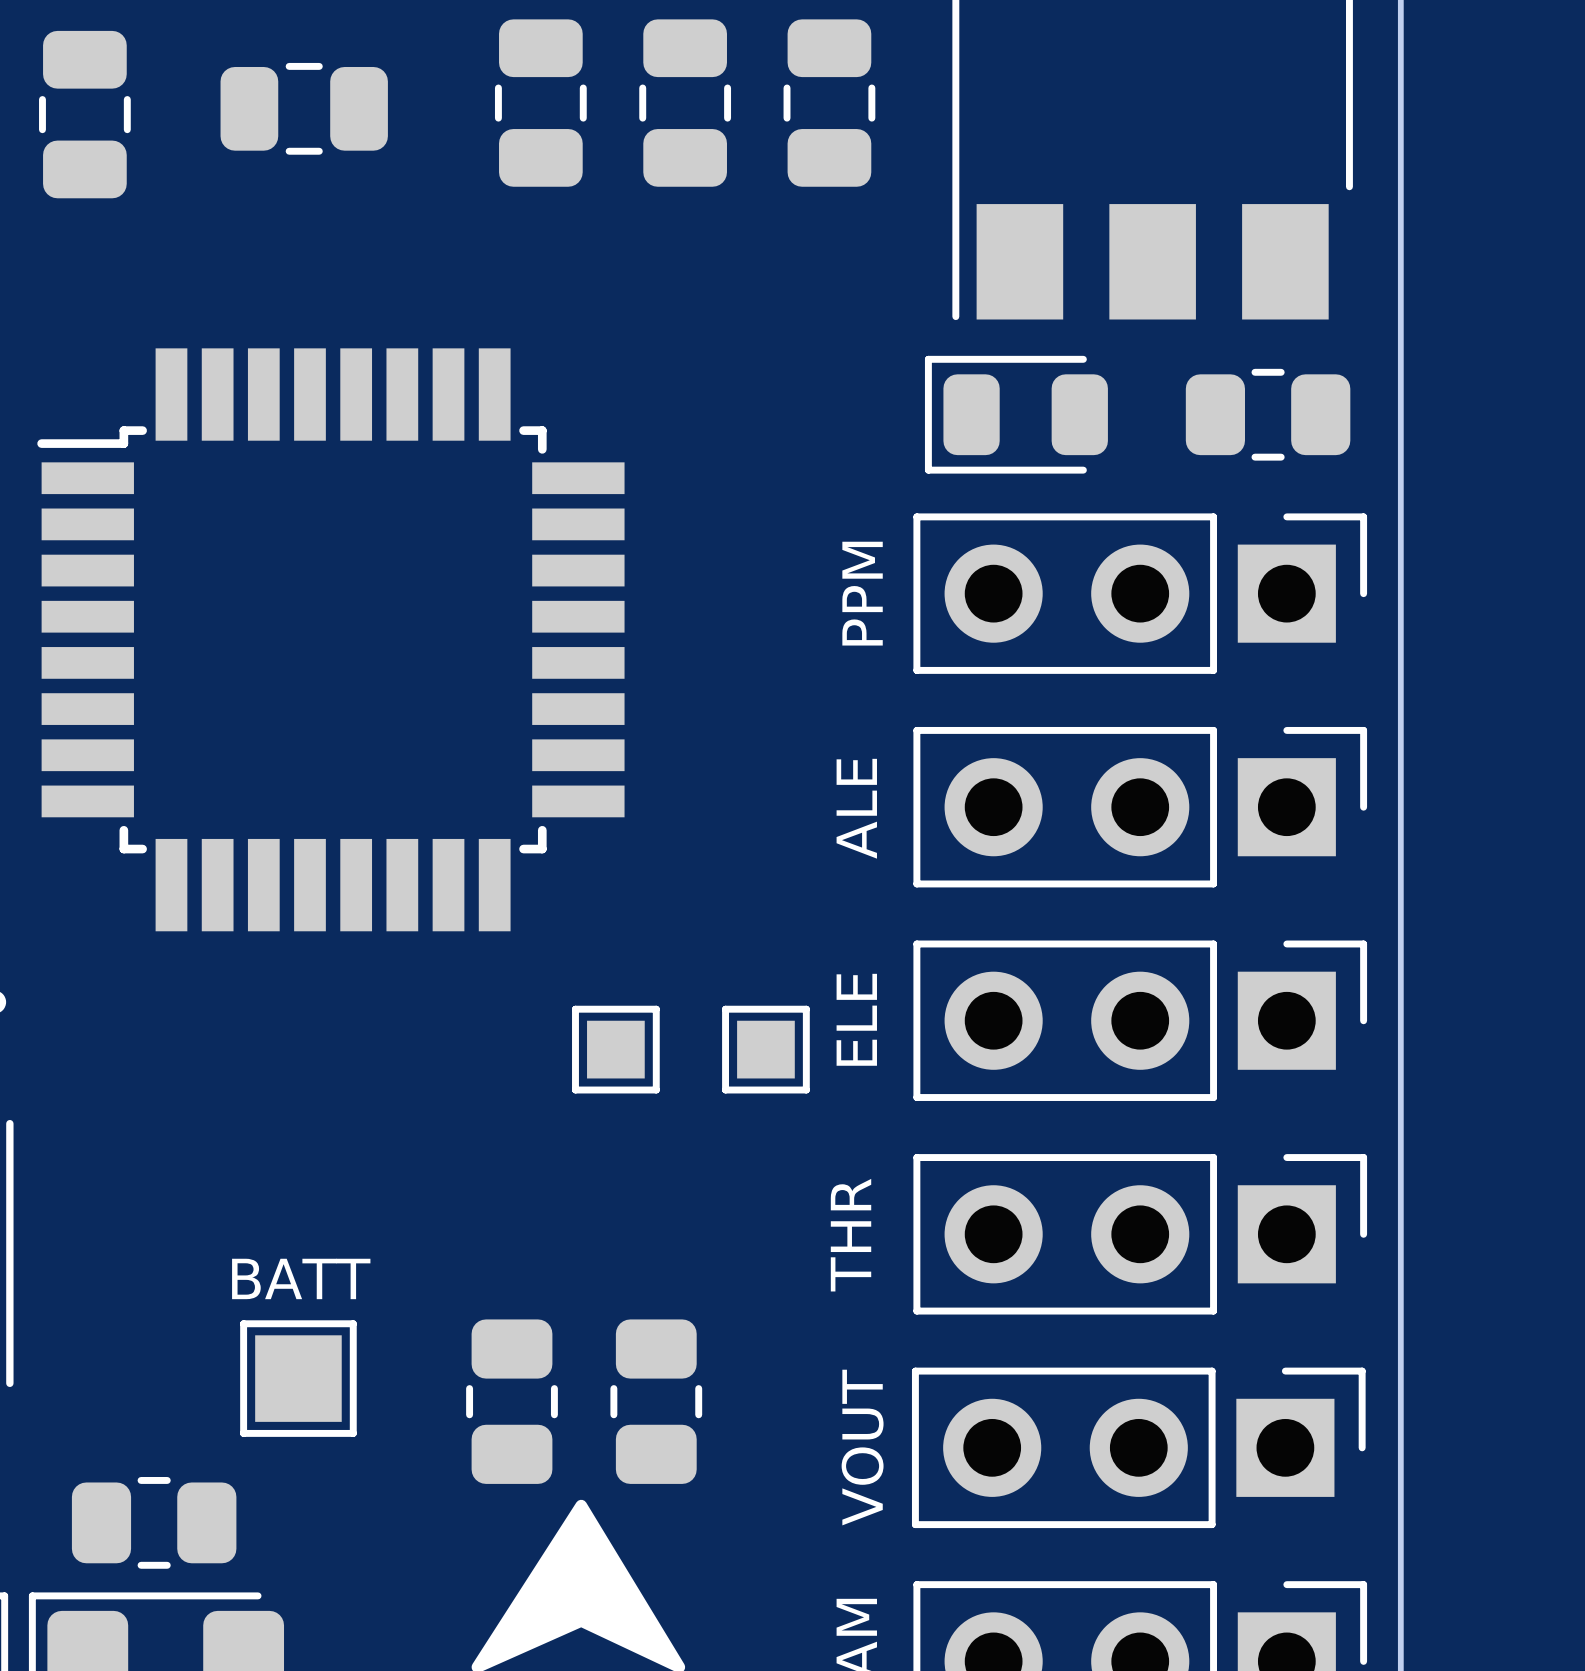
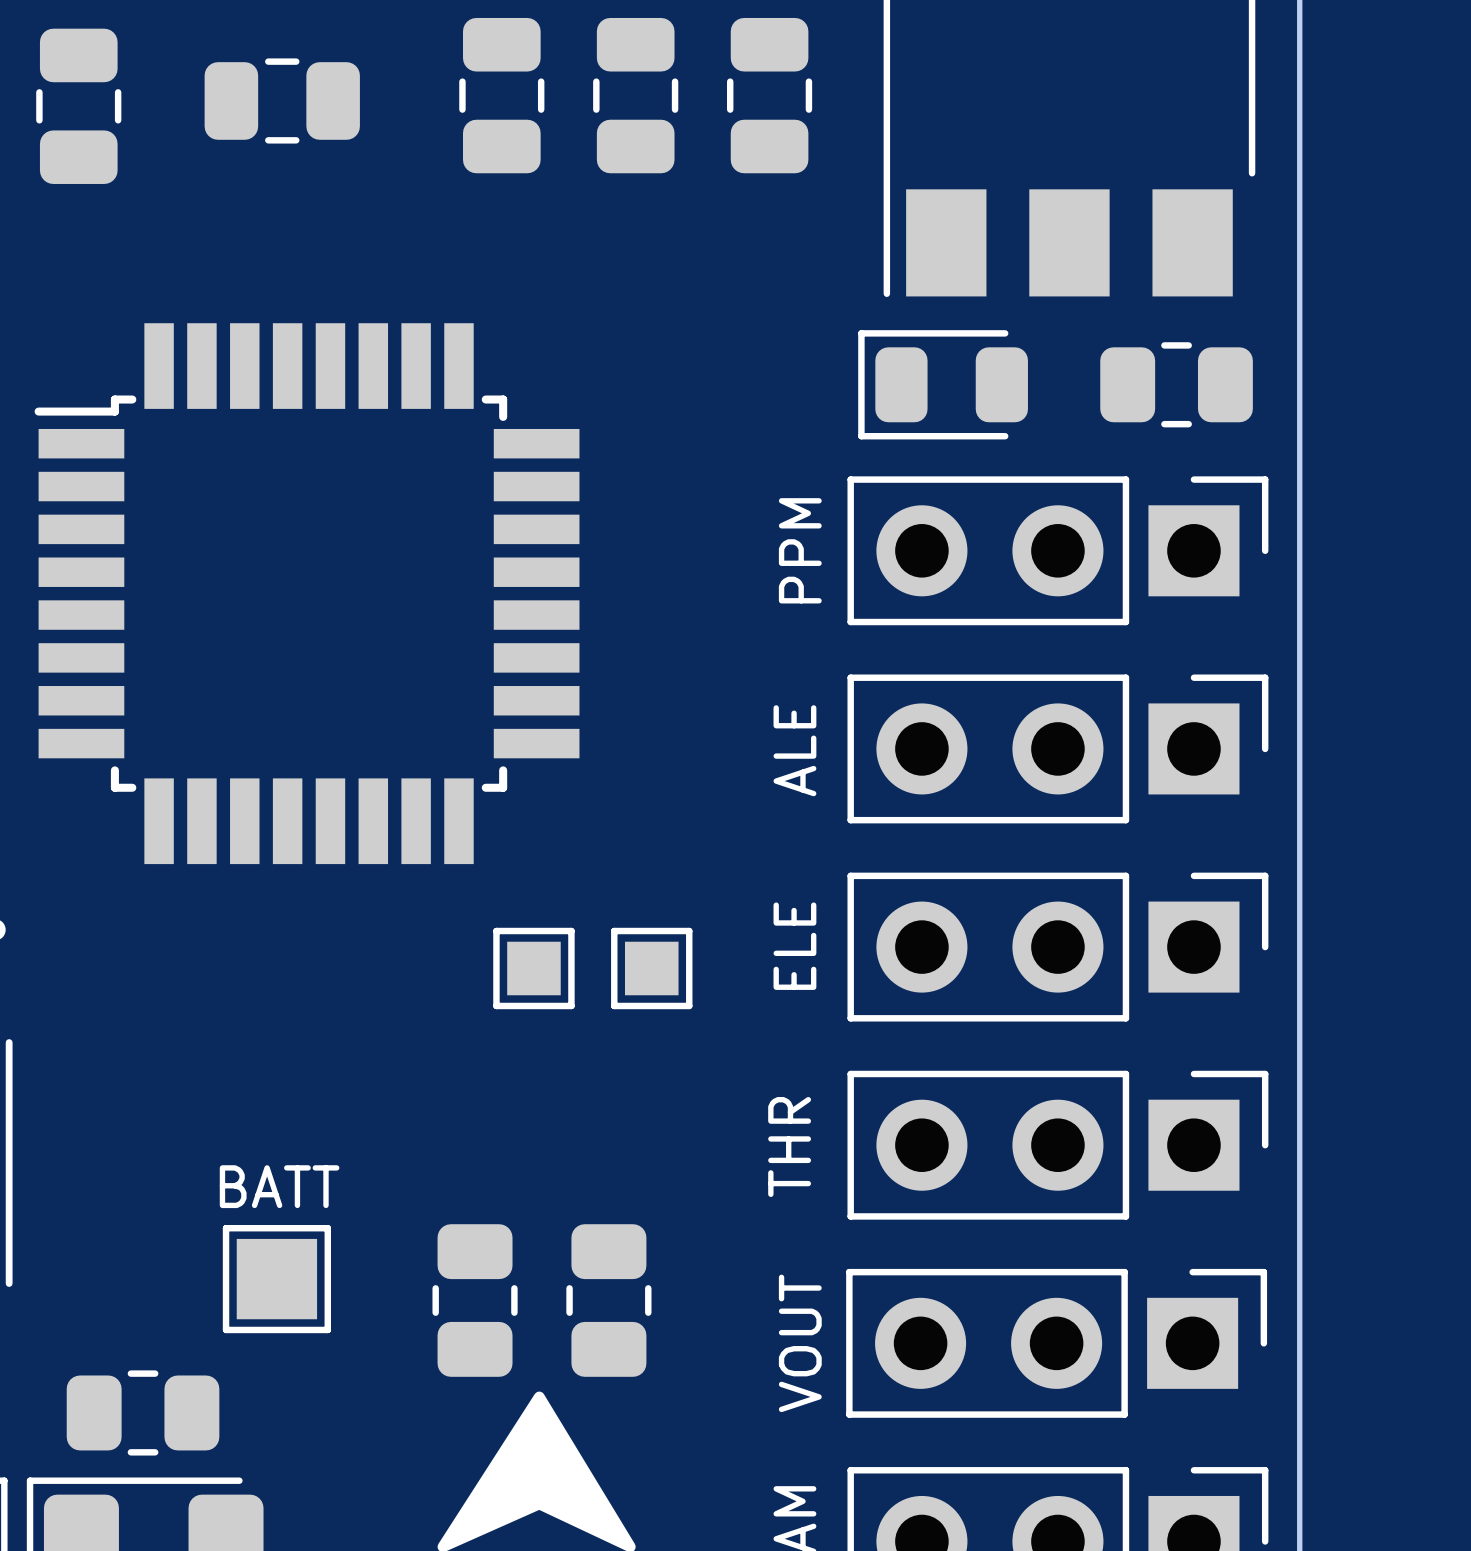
part position: (615, 1049) -> (533, 968)
part position: (765, 1049) -> (651, 968)

